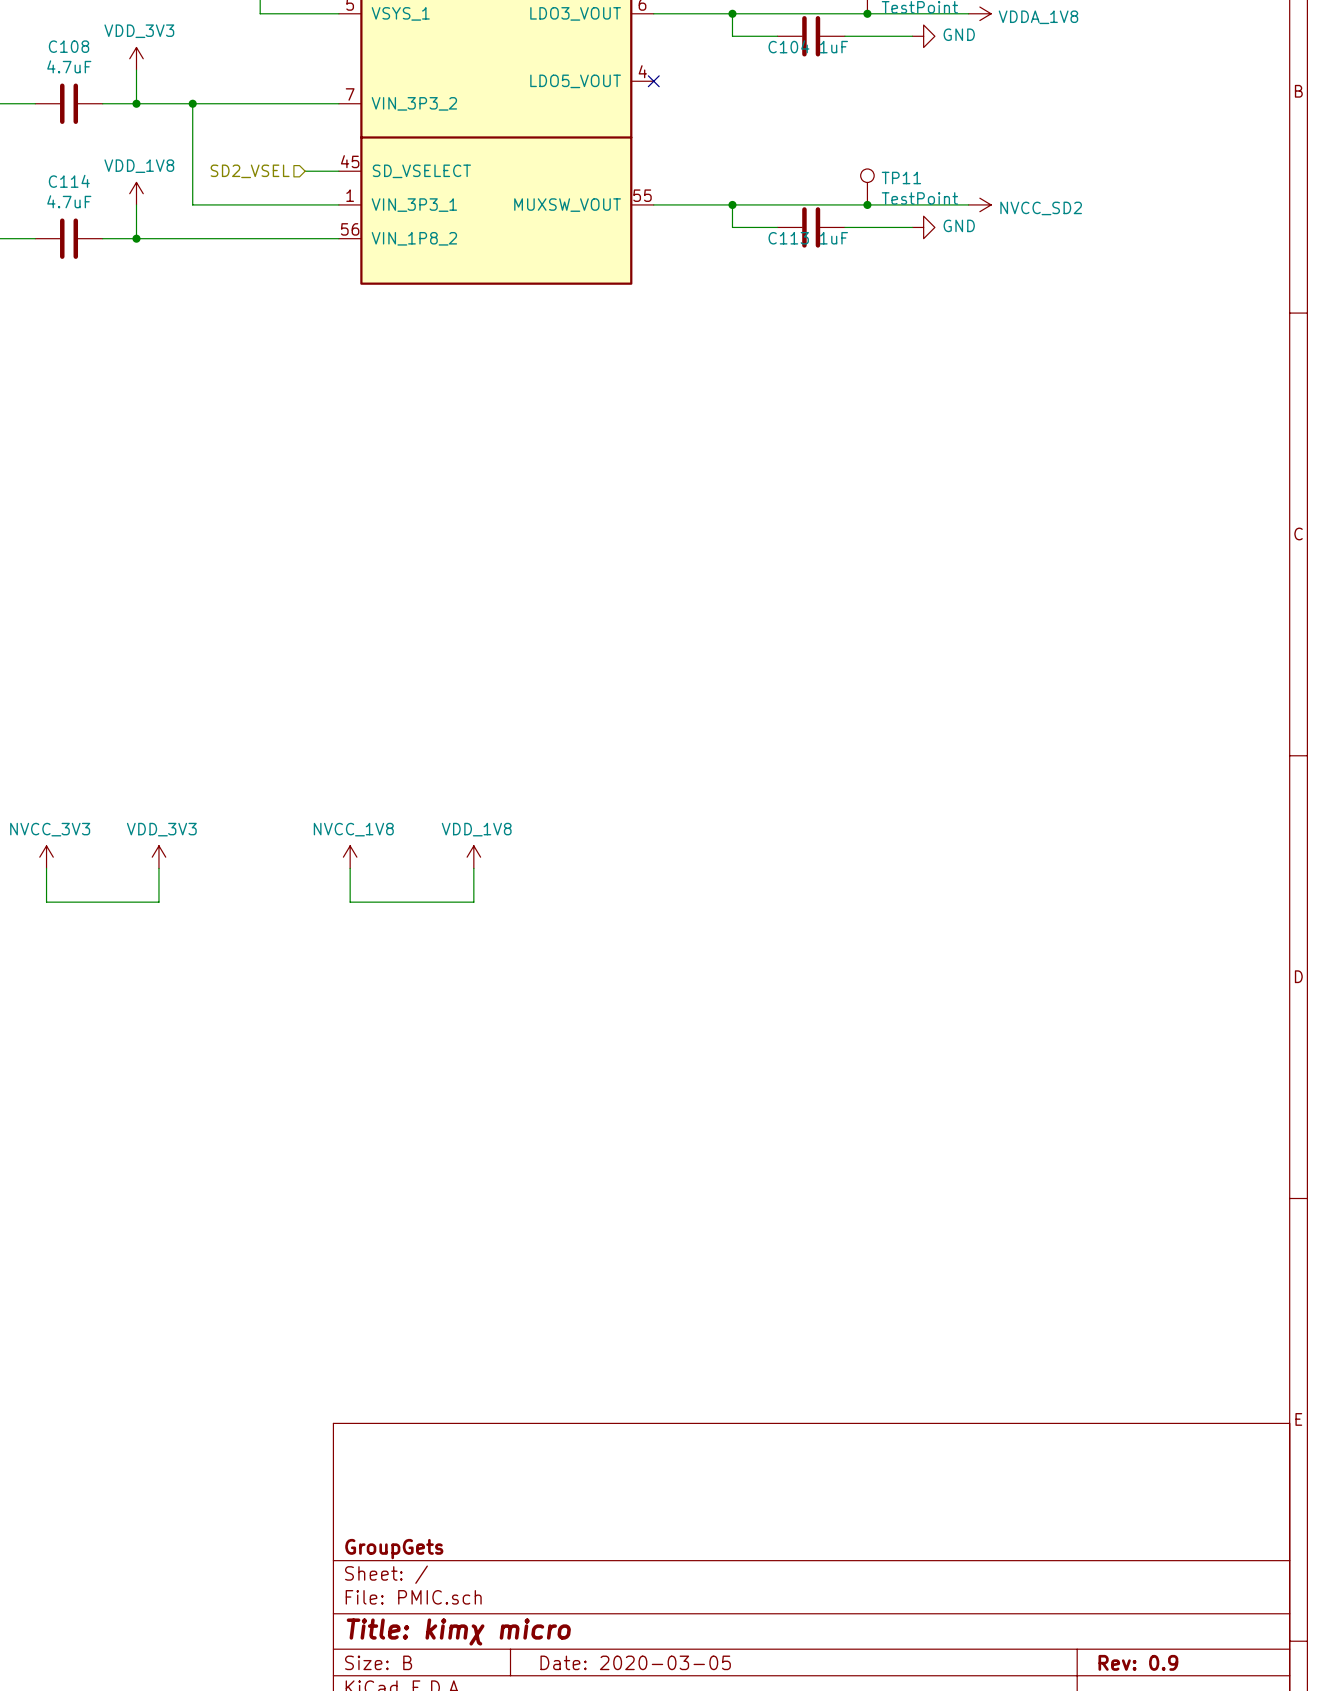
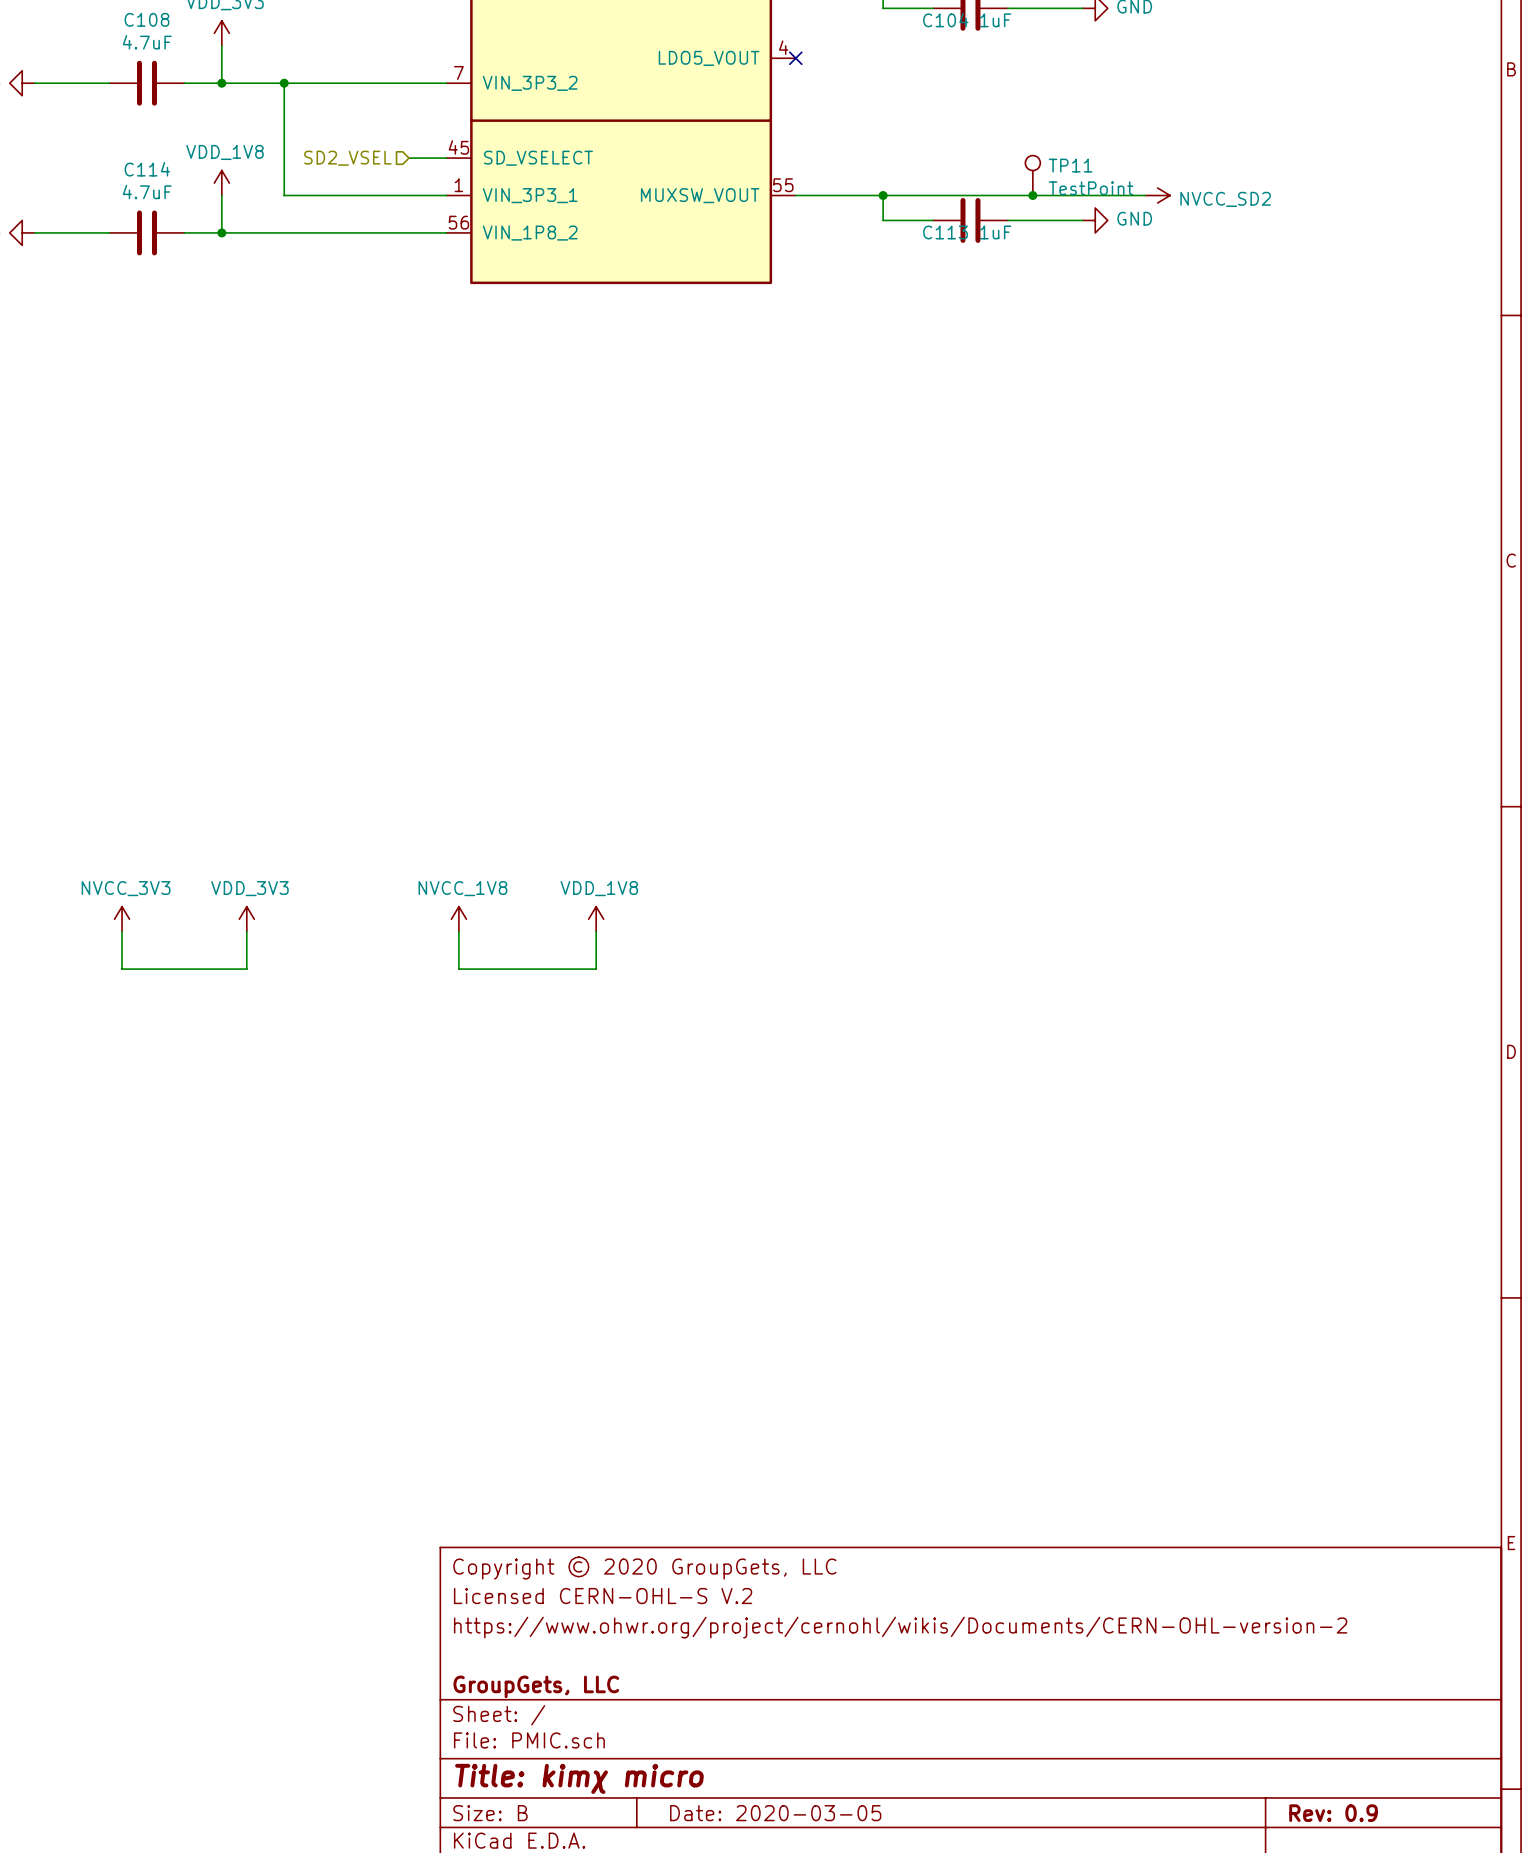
title block: none -> Copyright © 2020 GroupGets, LLC (644, 1567)
title block: none -> Licensed CERN-OHL-S V.2 (603, 1596)
title block: none -> https://www.ohwr.org/project/cernohl/wikis/Documents/CERN-OHL-version-2 (900, 1627)
title block: GroupGets (394, 1549) -> GroupGets, LLC (536, 1686)

